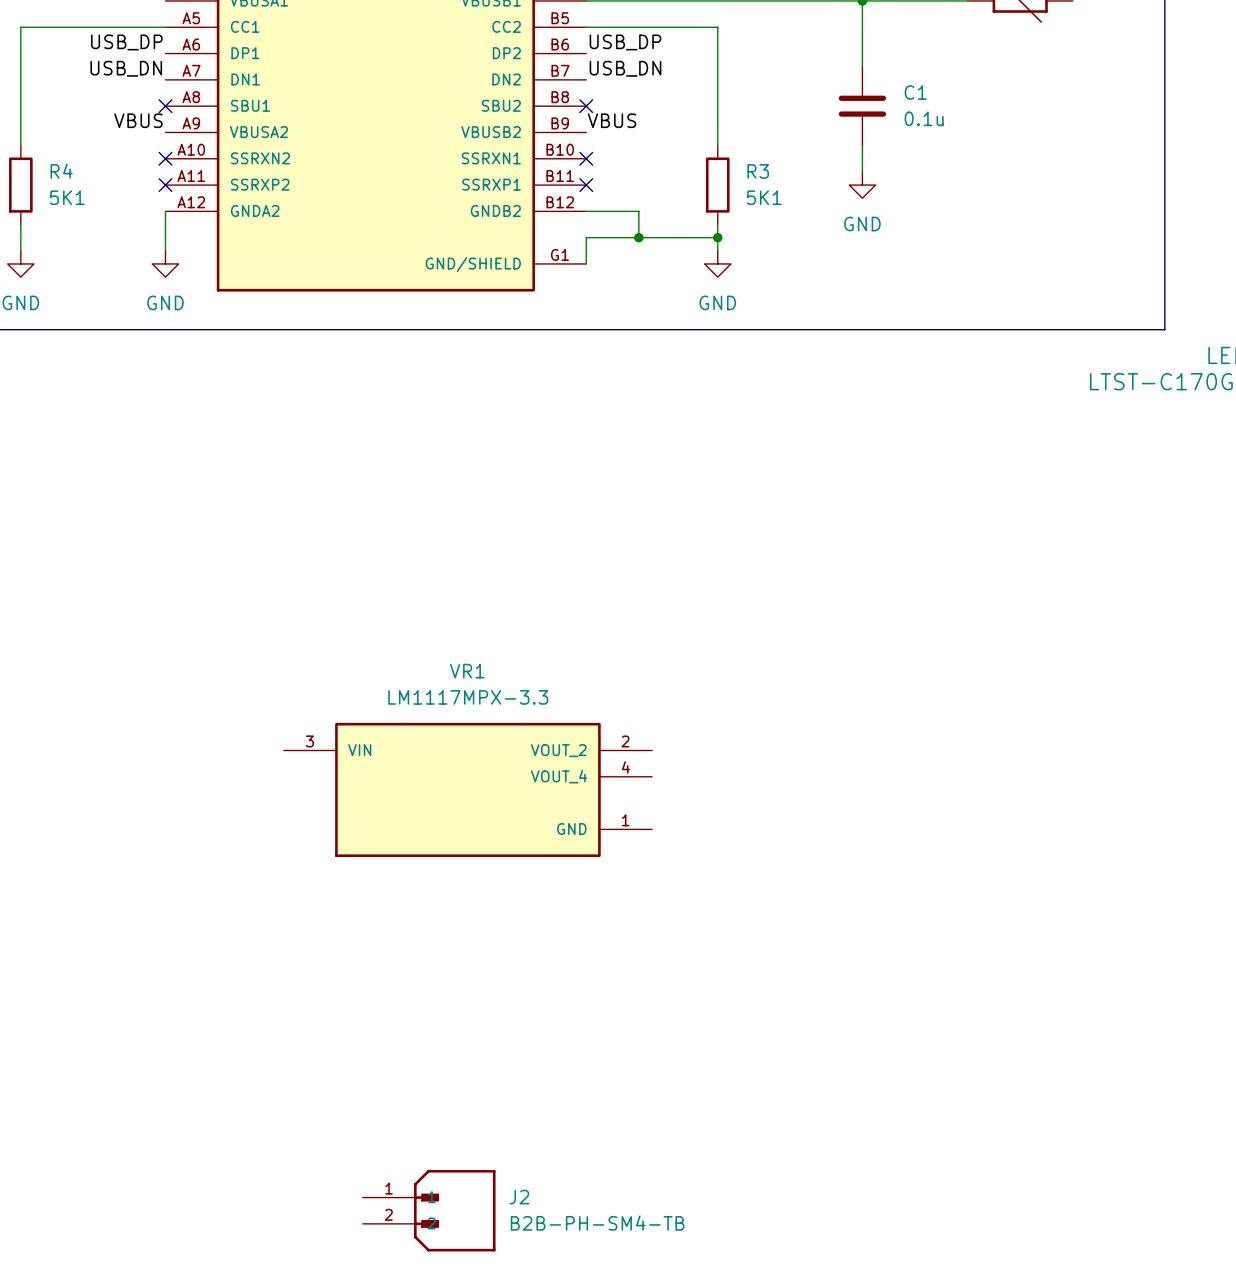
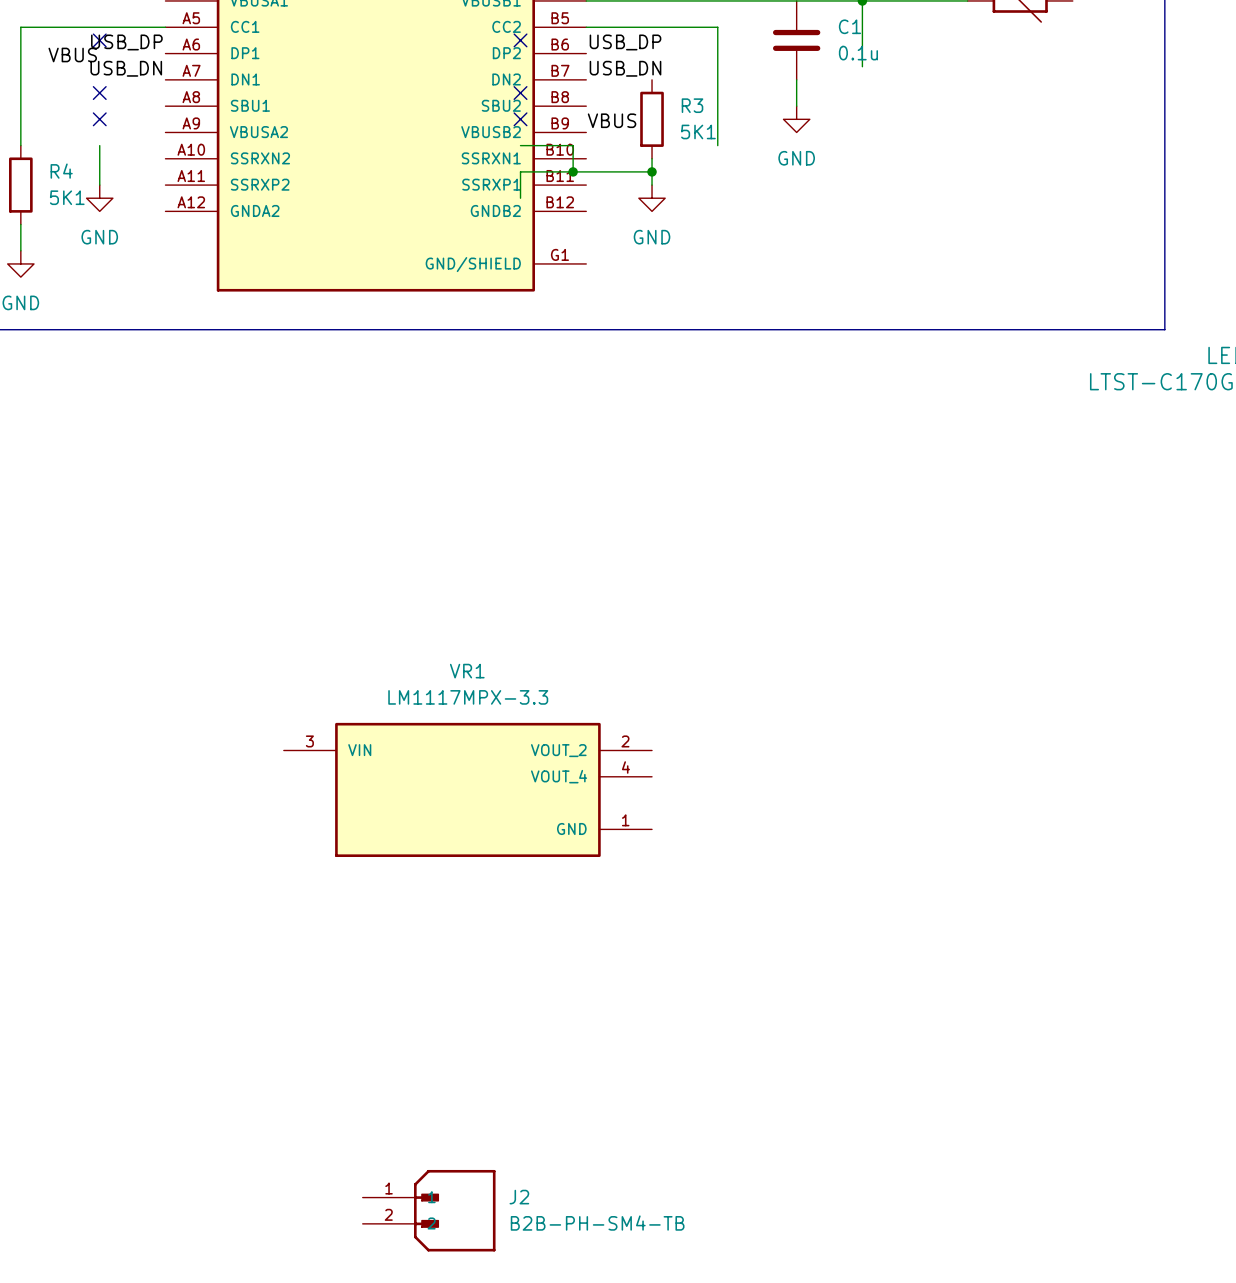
no-connect mark: none -> (99, 40)
no-connect mark: none -> (520, 40)
no-connect mark: none -> (99, 93)
no-connect mark: none -> (520, 93)
no-connect mark: (165, 106) -> none
no-connect mark: (586, 106) -> none
C1 position: (862, 106) -> (796, 40)
no-connect mark: none -> (99, 119)
no-connect mark: none -> (520, 119)
power symbol: none -> GND (796, 119)
label position: VBUS (138, 120) -> VBUS (72, 54)
wire: (862, 145) (862, 171) -> (796, 79) (796, 106)
no-connect mark: (165, 158) -> none
no-connect mark: (586, 158) -> none
junction: none -> (573, 171)
junction: none -> (652, 171)
no-connect mark: (165, 185) -> none
no-connect mark: (586, 185) -> none
R3 position: (717, 185) -> (652, 119)
power symbol: GND (862, 185) -> none
power symbol: none -> GND (652, 198)
wire: (165, 211) (165, 250) -> (99, 145) (99, 185)
wire: (586, 211) (638, 211) (638, 237) -> (520, 145) (573, 145) (573, 171)
wire: (717, 224) (717, 250) -> (652, 158) (652, 185)
junction: (638, 237) -> none
wire: (717, 237) (586, 237) (586, 263) -> (652, 171) (520, 171) (520, 198)
junction: (717, 237) -> none
power symbol position: GND (165, 263) -> GND (99, 198)
power symbol: GND (717, 263) -> none

